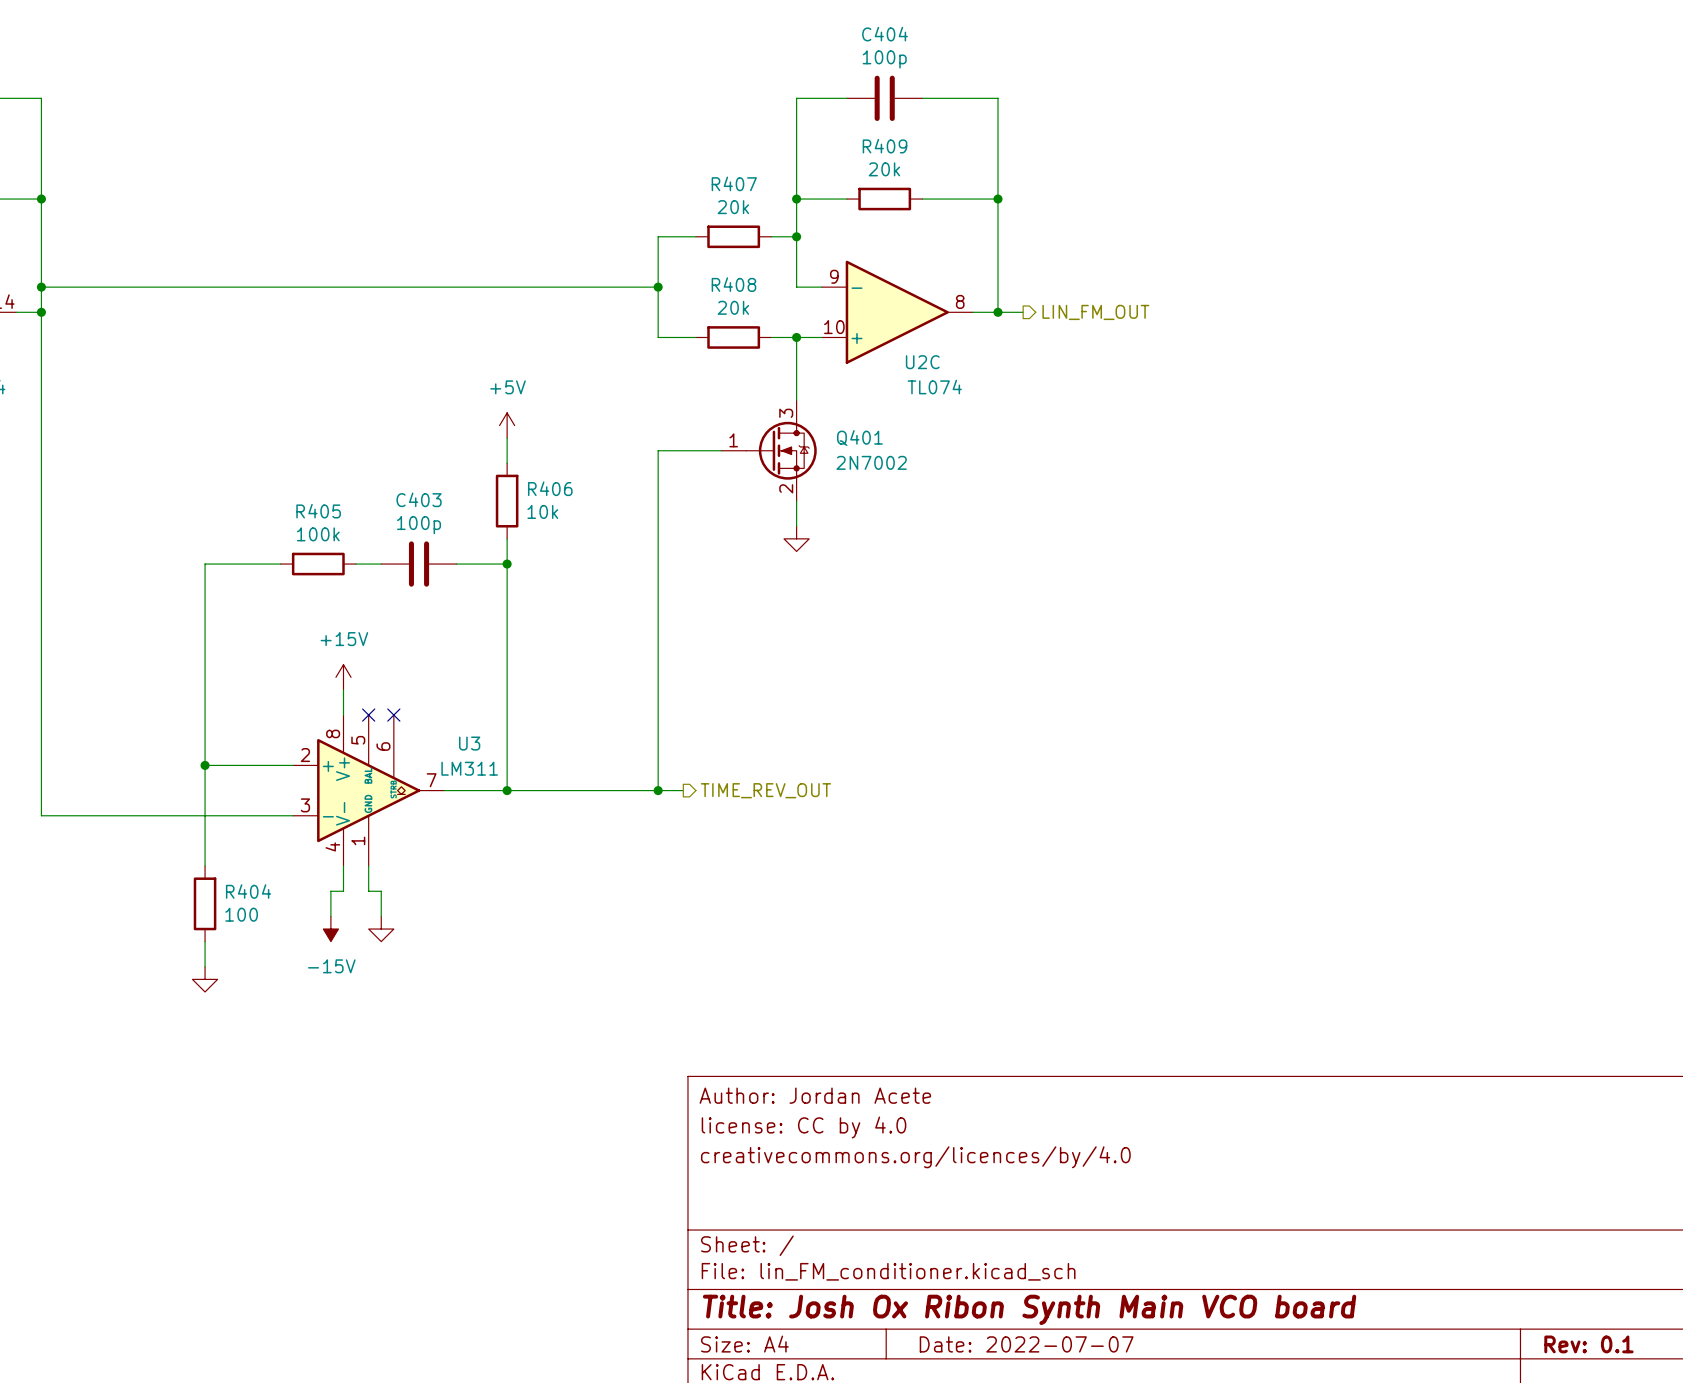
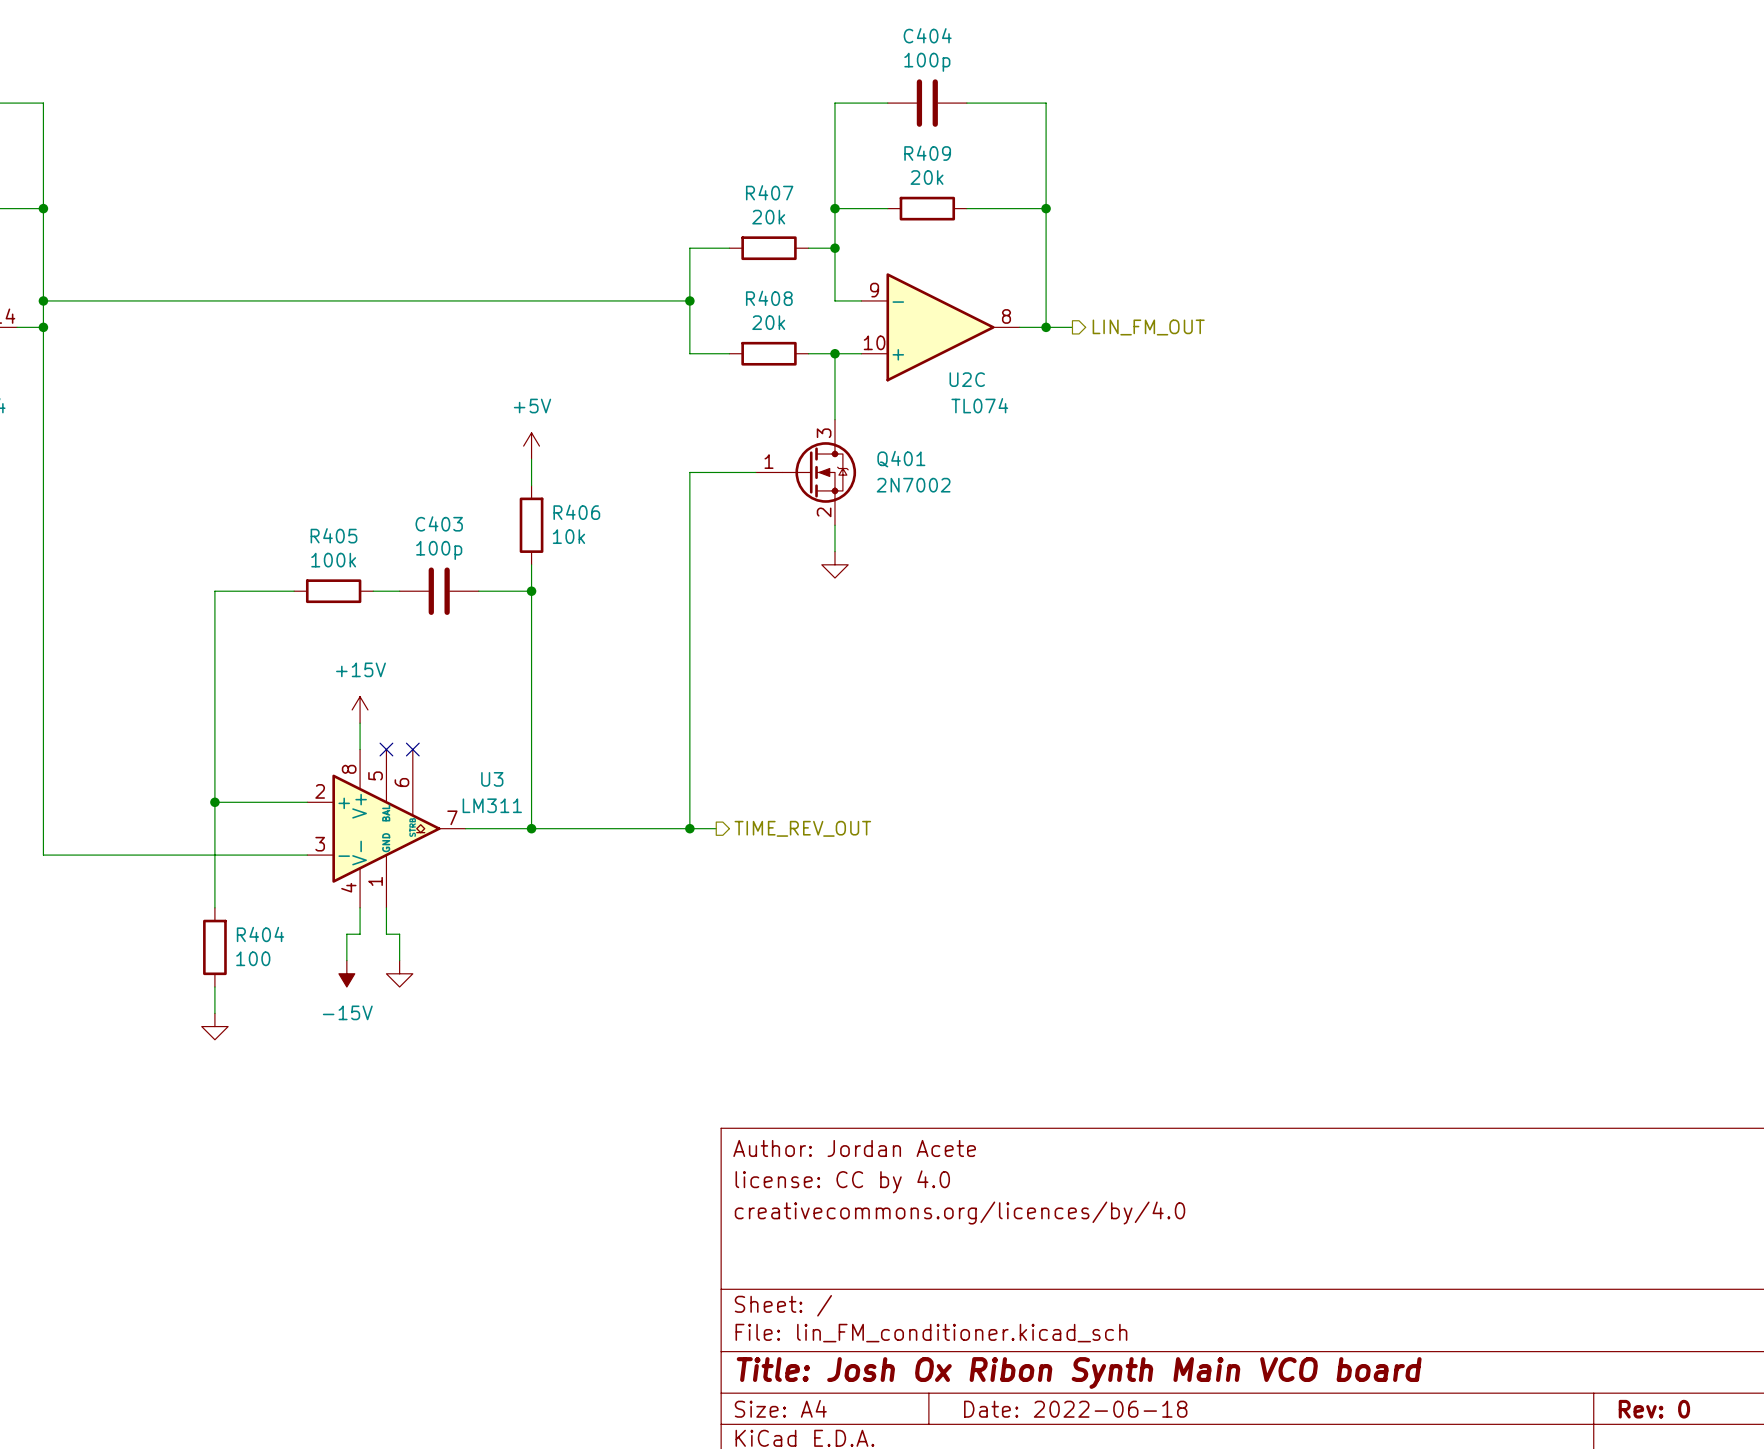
title block: Date: 2022-07-07 (1026, 1344) -> Date: 2022-06-18 (1075, 1409)
title block: Rev: 0.1 (1588, 1344) -> Rev: 0 (1654, 1409)

